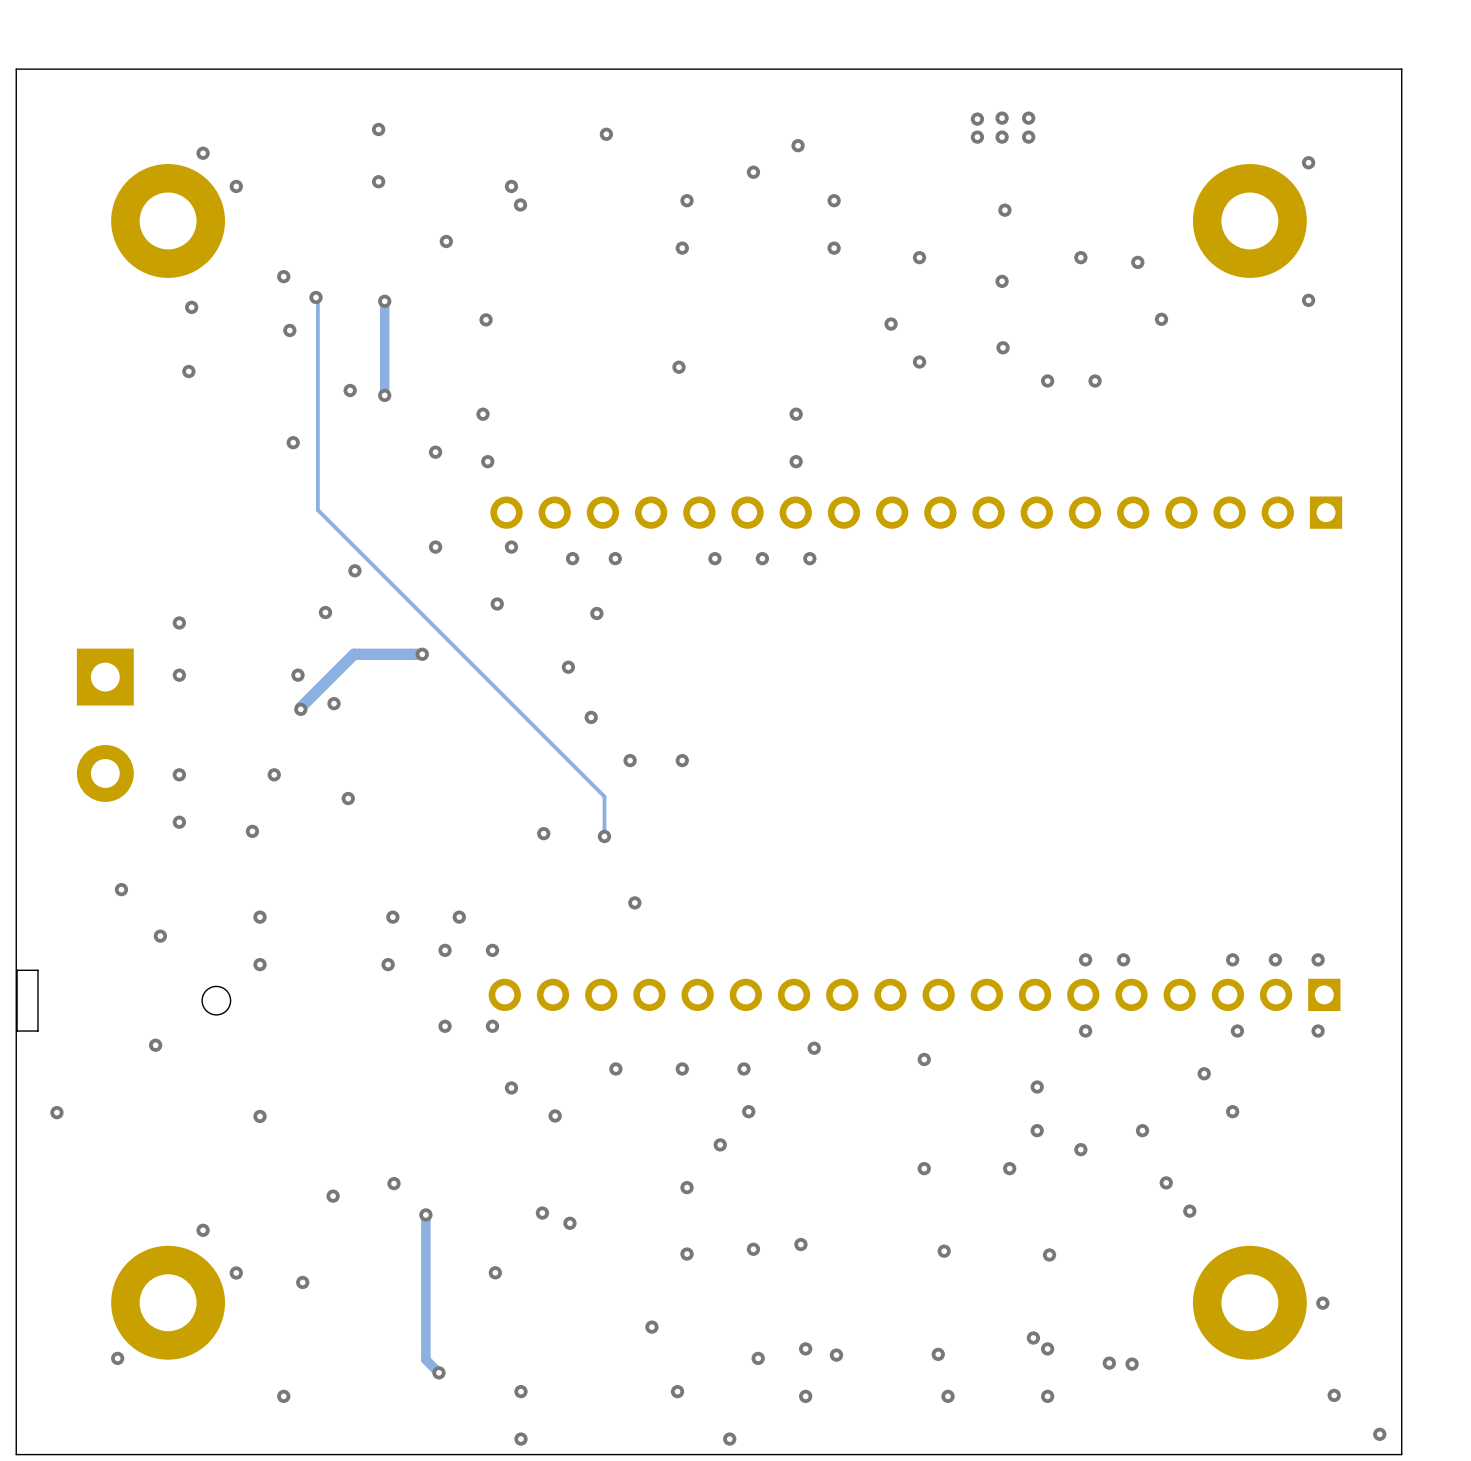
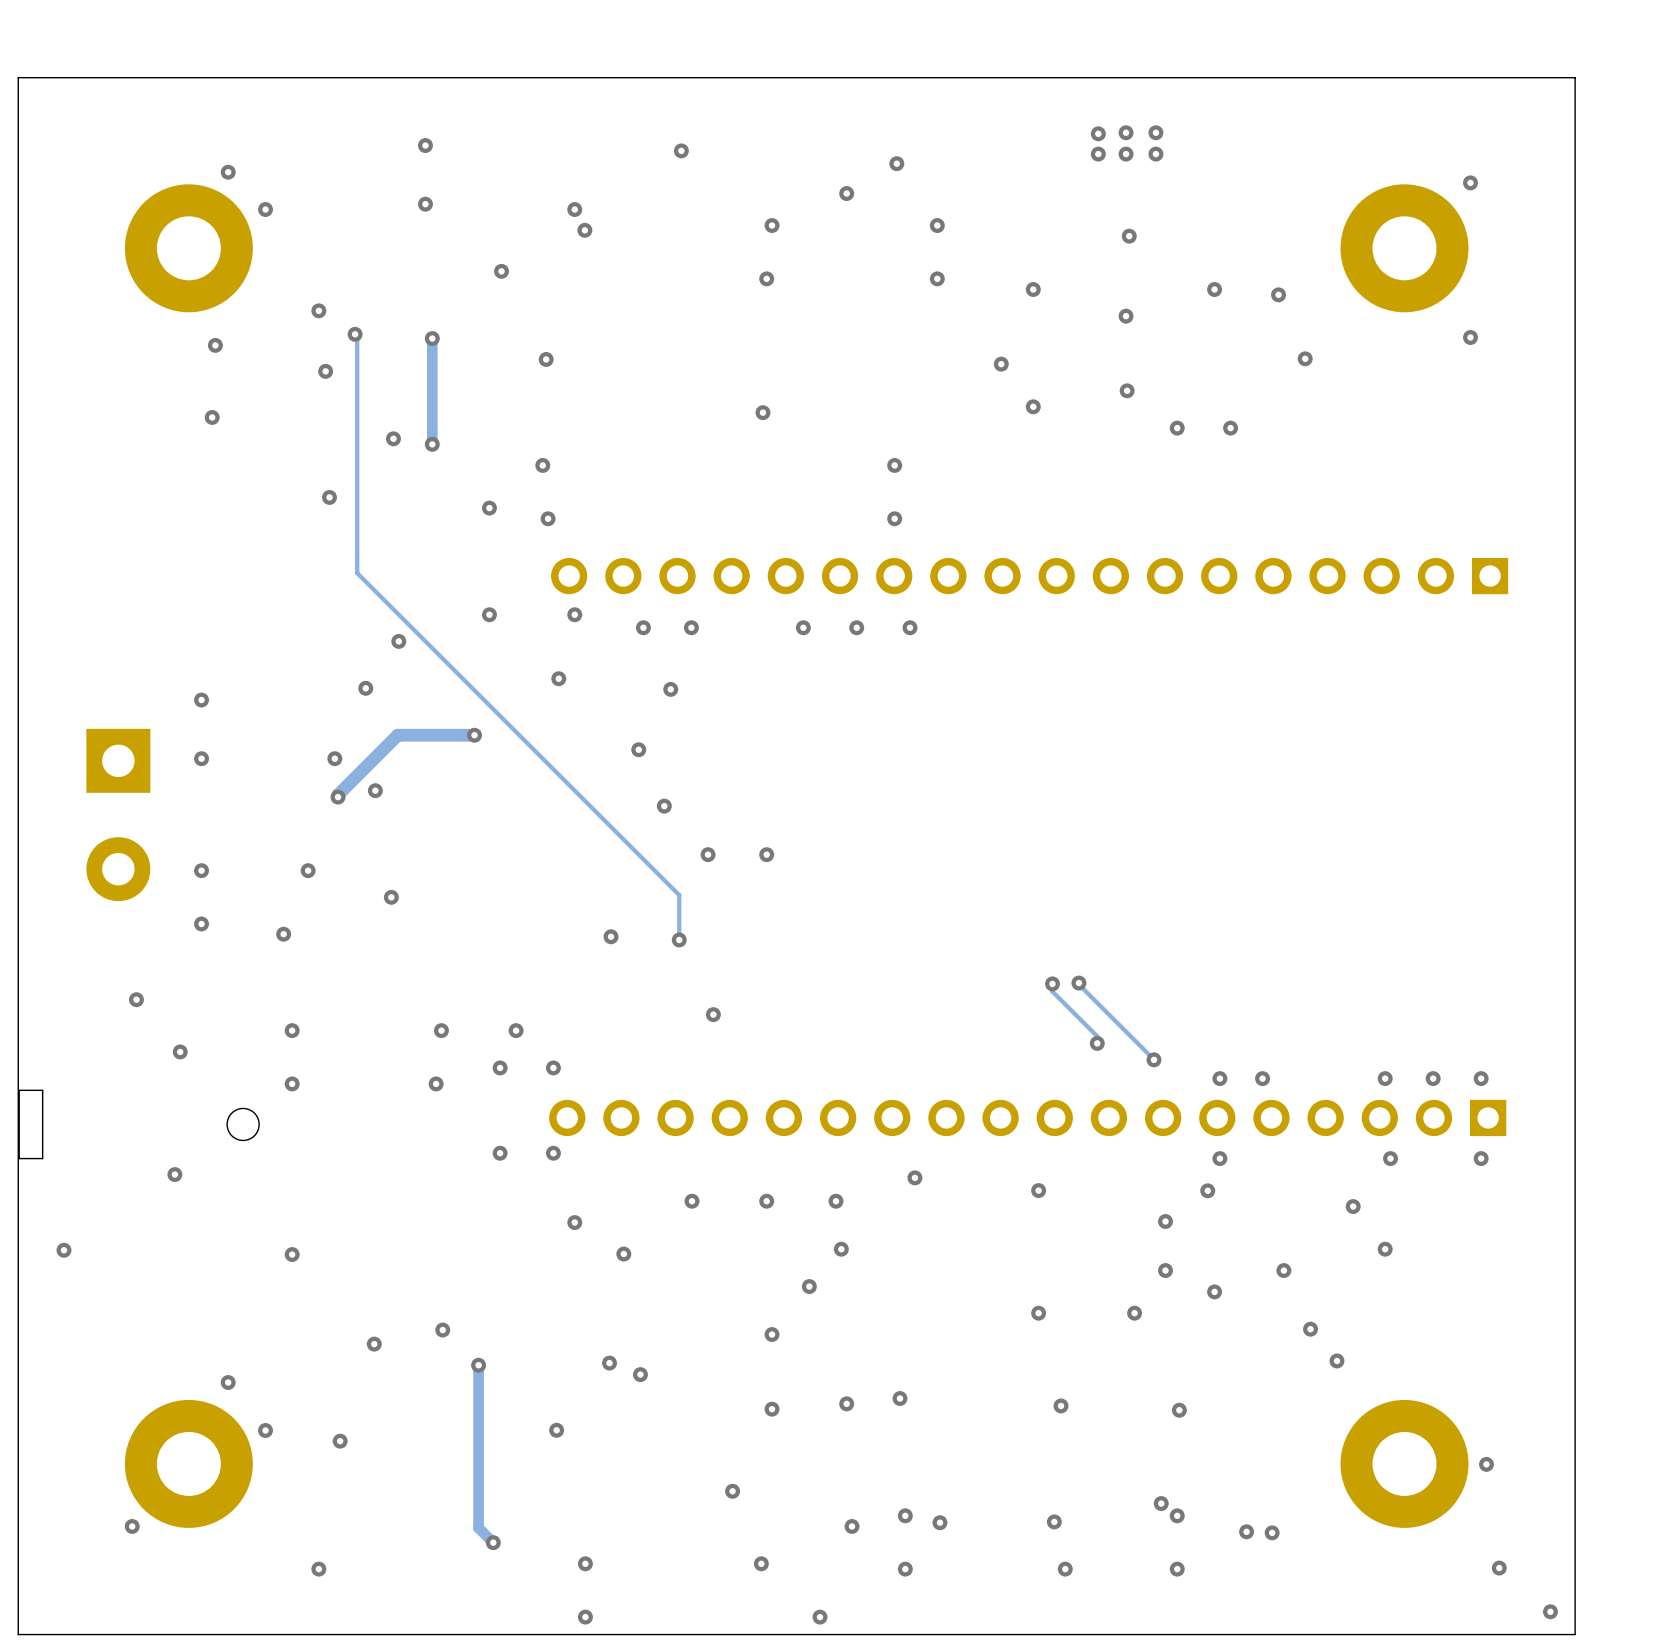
track: none -> (1078, 983) (1154, 1059)
via: none -> (1078, 983)
track: none -> (1052, 983) (1052, 991) (1097, 1036) (1097, 1043)
via: none -> (1052, 983)
via: none -> (1097, 1043)
via: none -> (1154, 1059)
via: none -> (1207, 1190)

